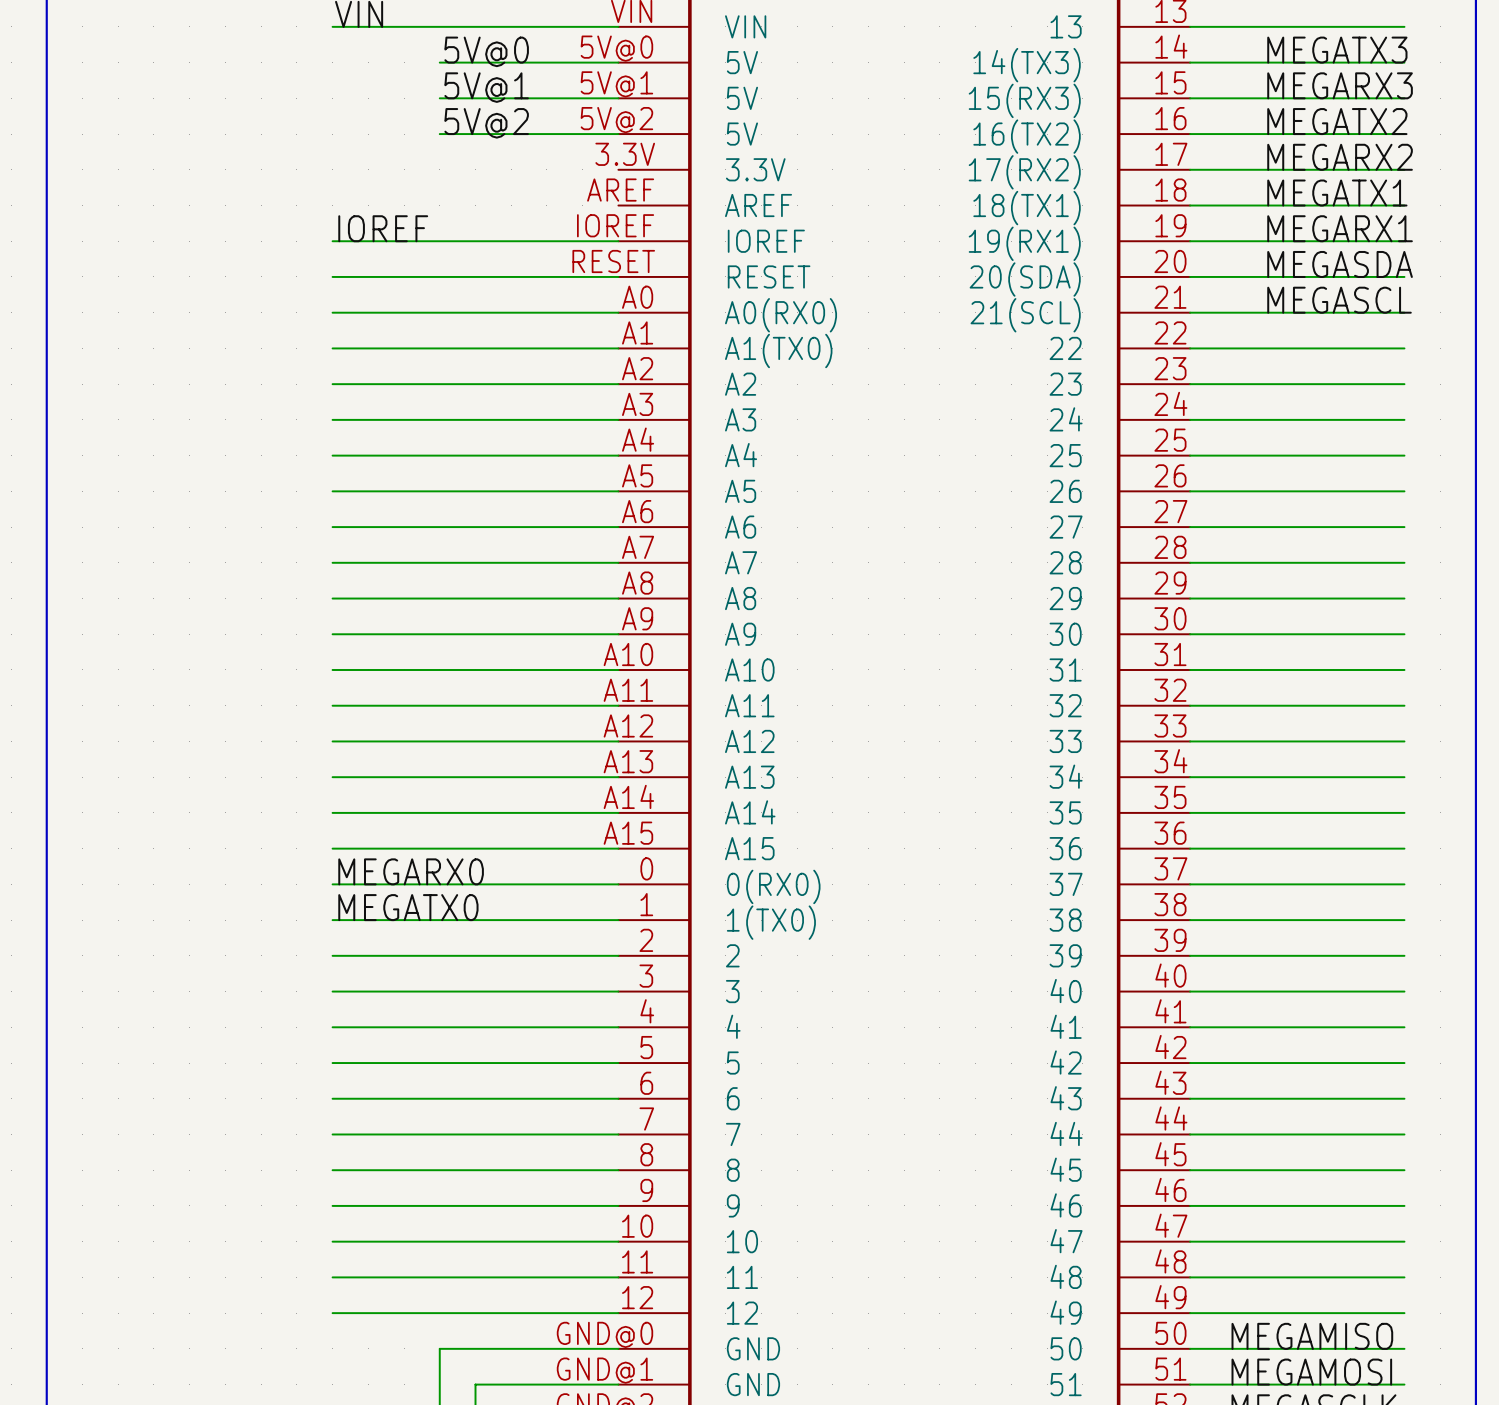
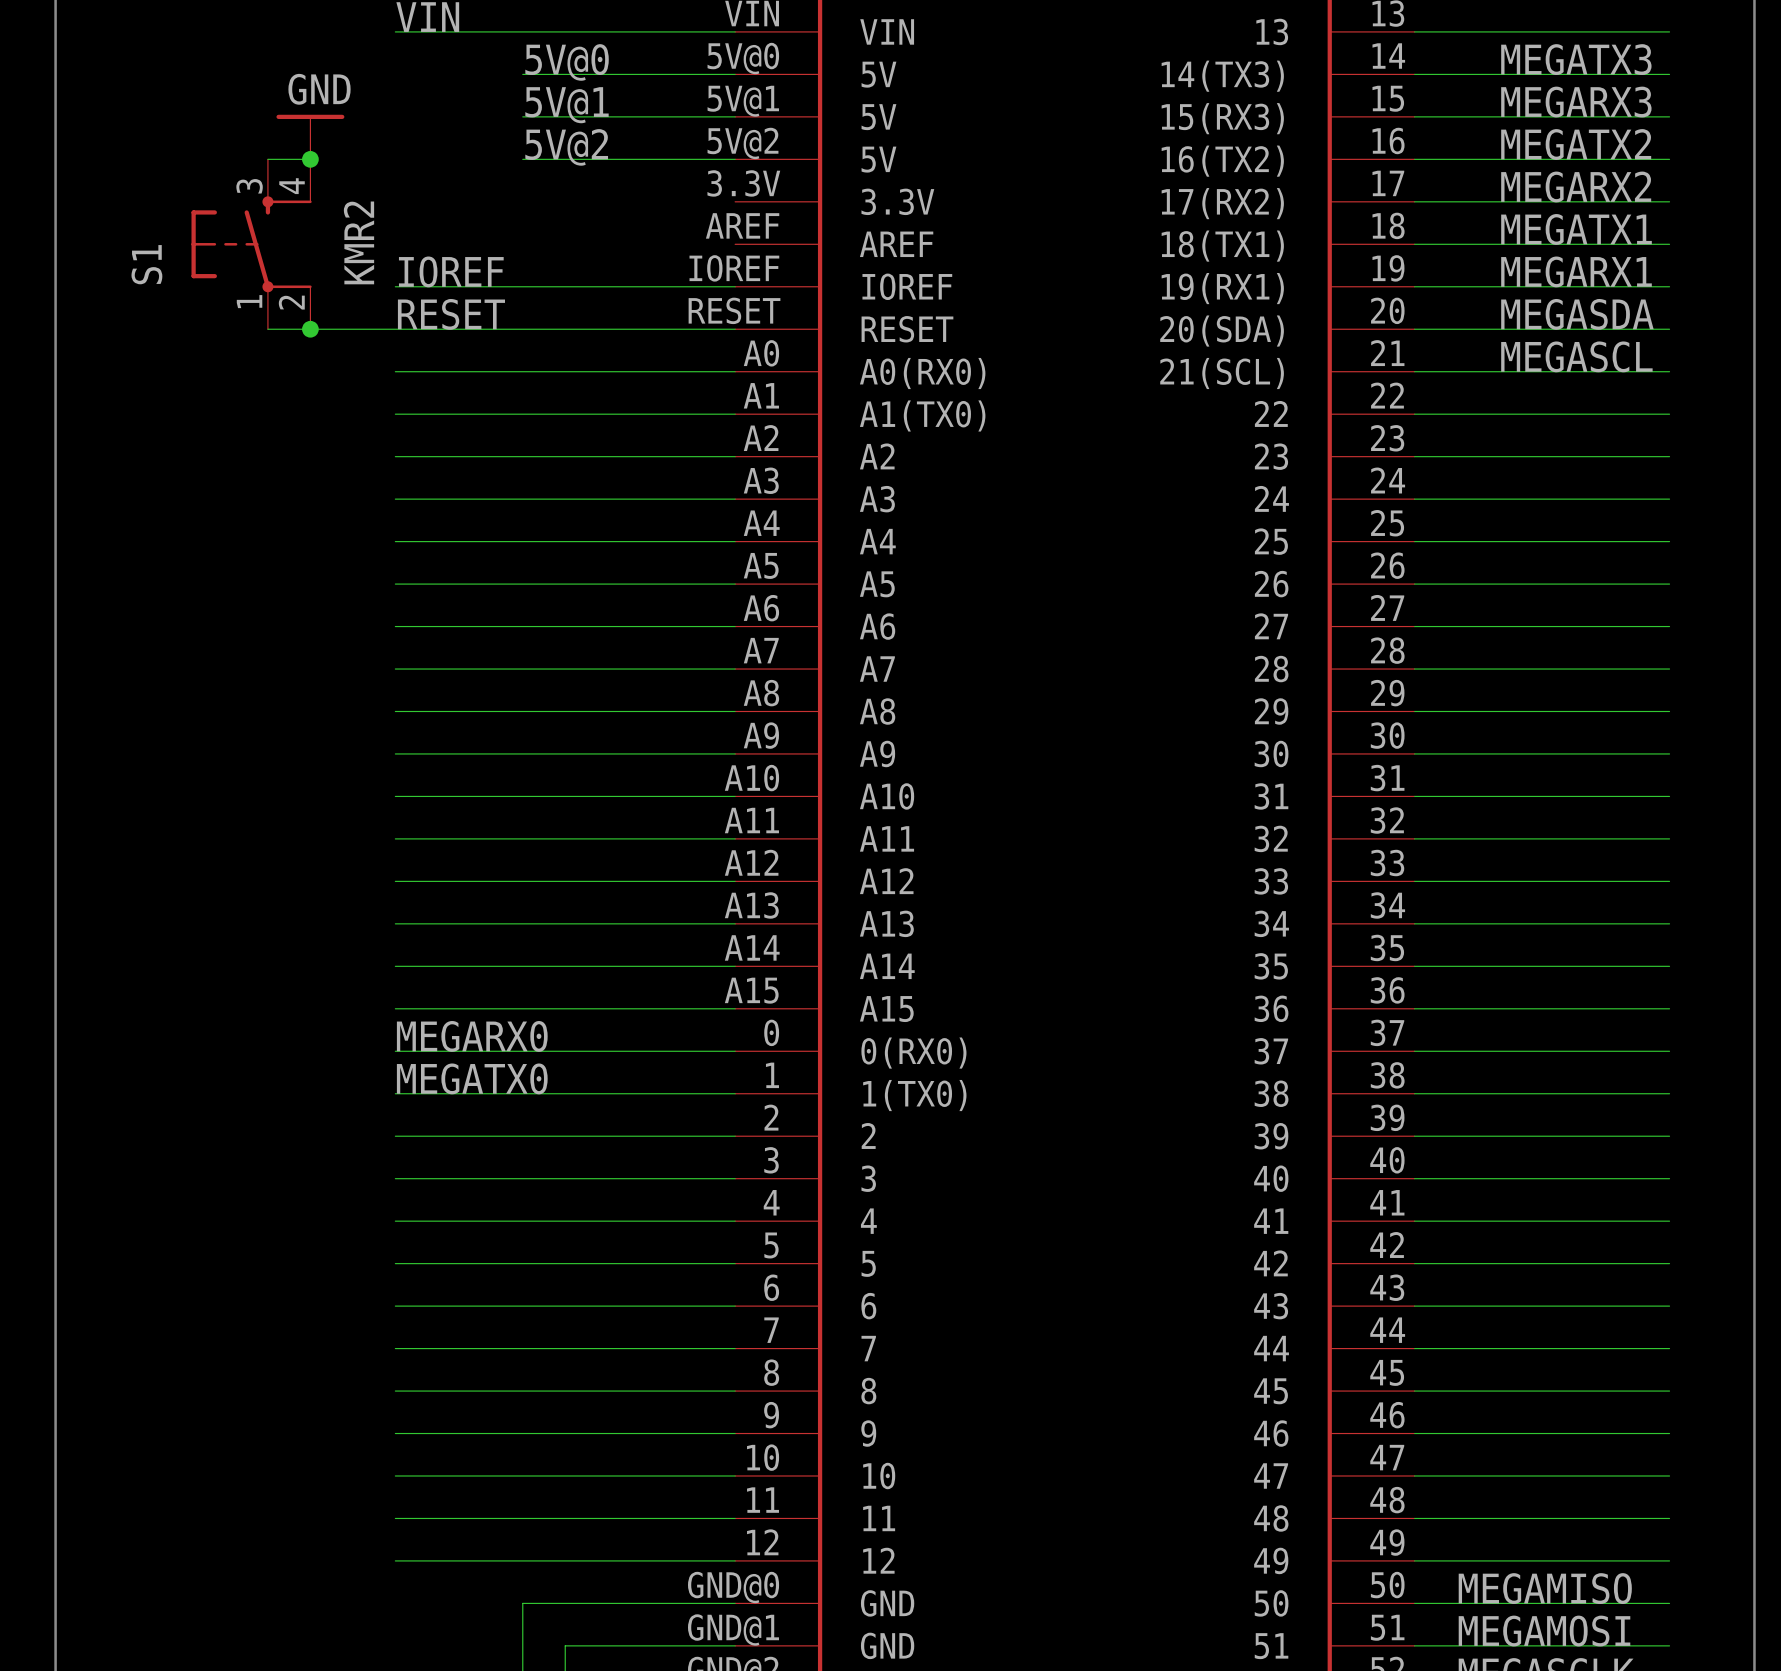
power symbol: none -> GND (310, 137)
wire: none -> (267, 159) (310, 159)
junction: none -> (310, 159)
S1: none -> KMR2 (251, 244)
label: none -> RESET (451, 314)
wire: none -> (267, 329) (395, 329)
junction: none -> (310, 329)

